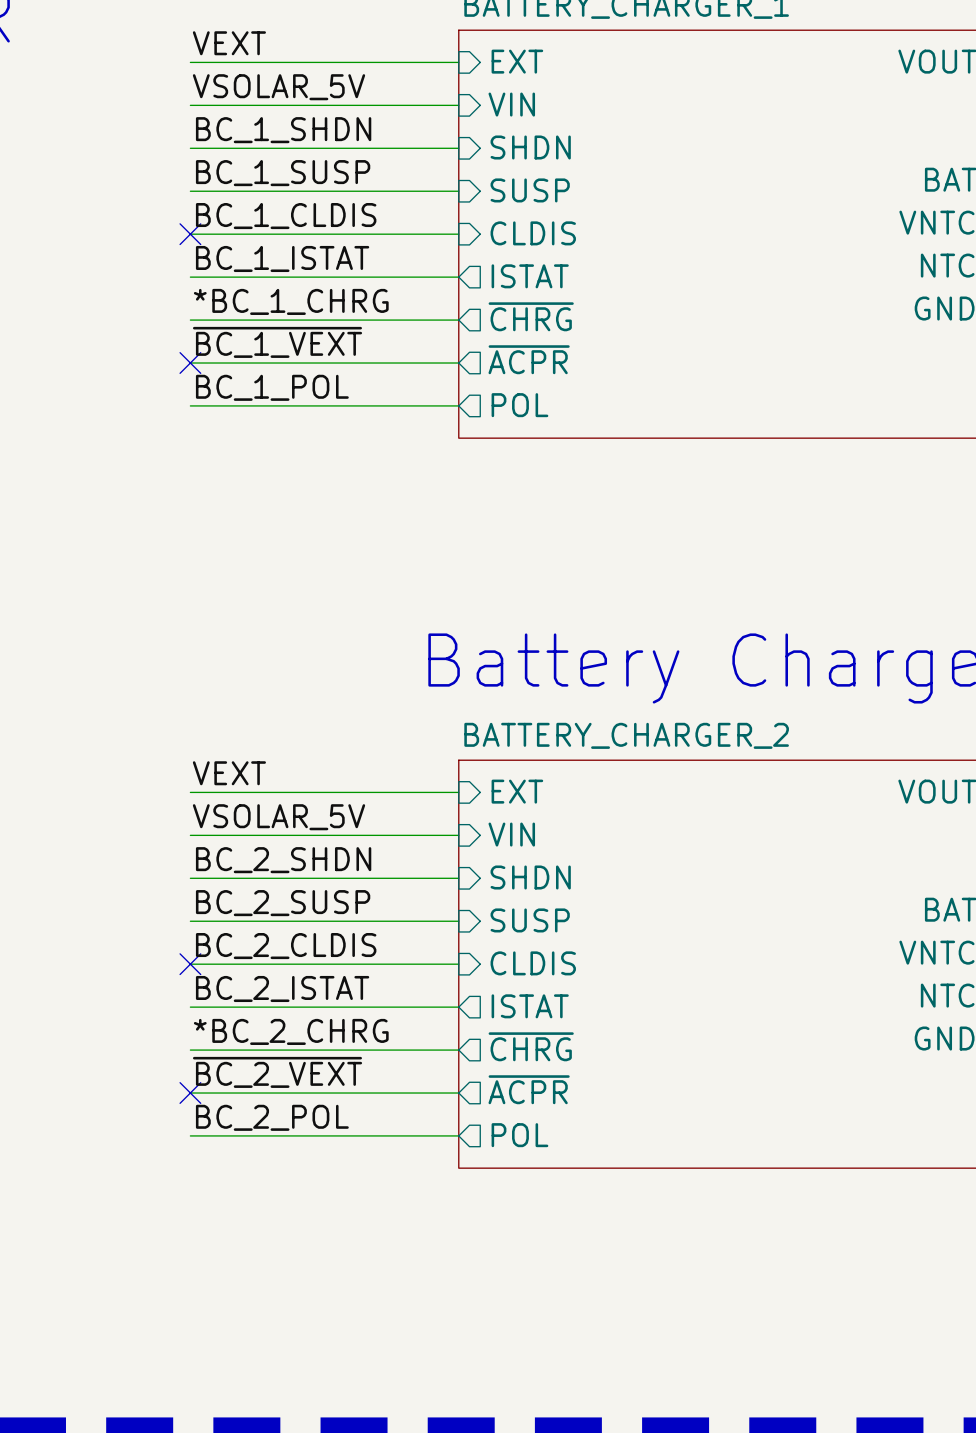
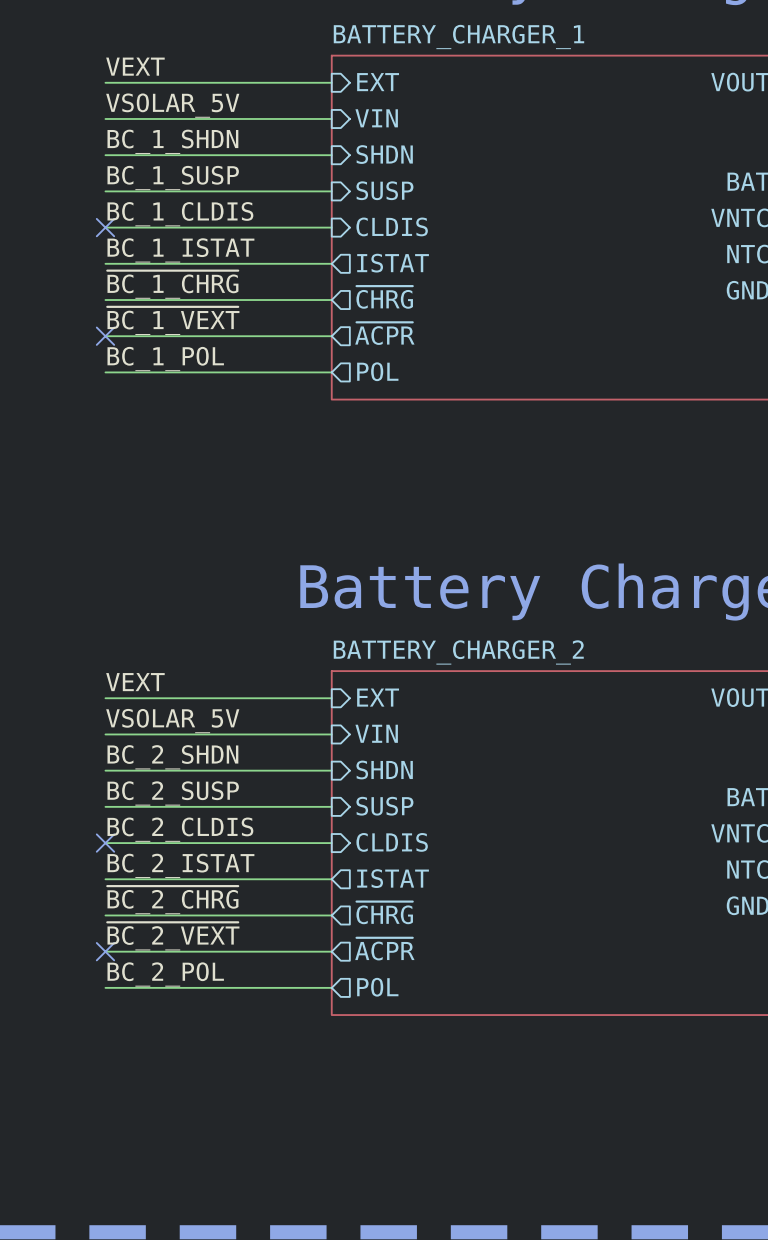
label: *BC_1_CHRG (291, 301) -> ~{BC_1_CHRG} (172, 284)
label: *BC_2_CHRG (291, 1031) -> ~{BC_2_CHRG} (172, 900)

